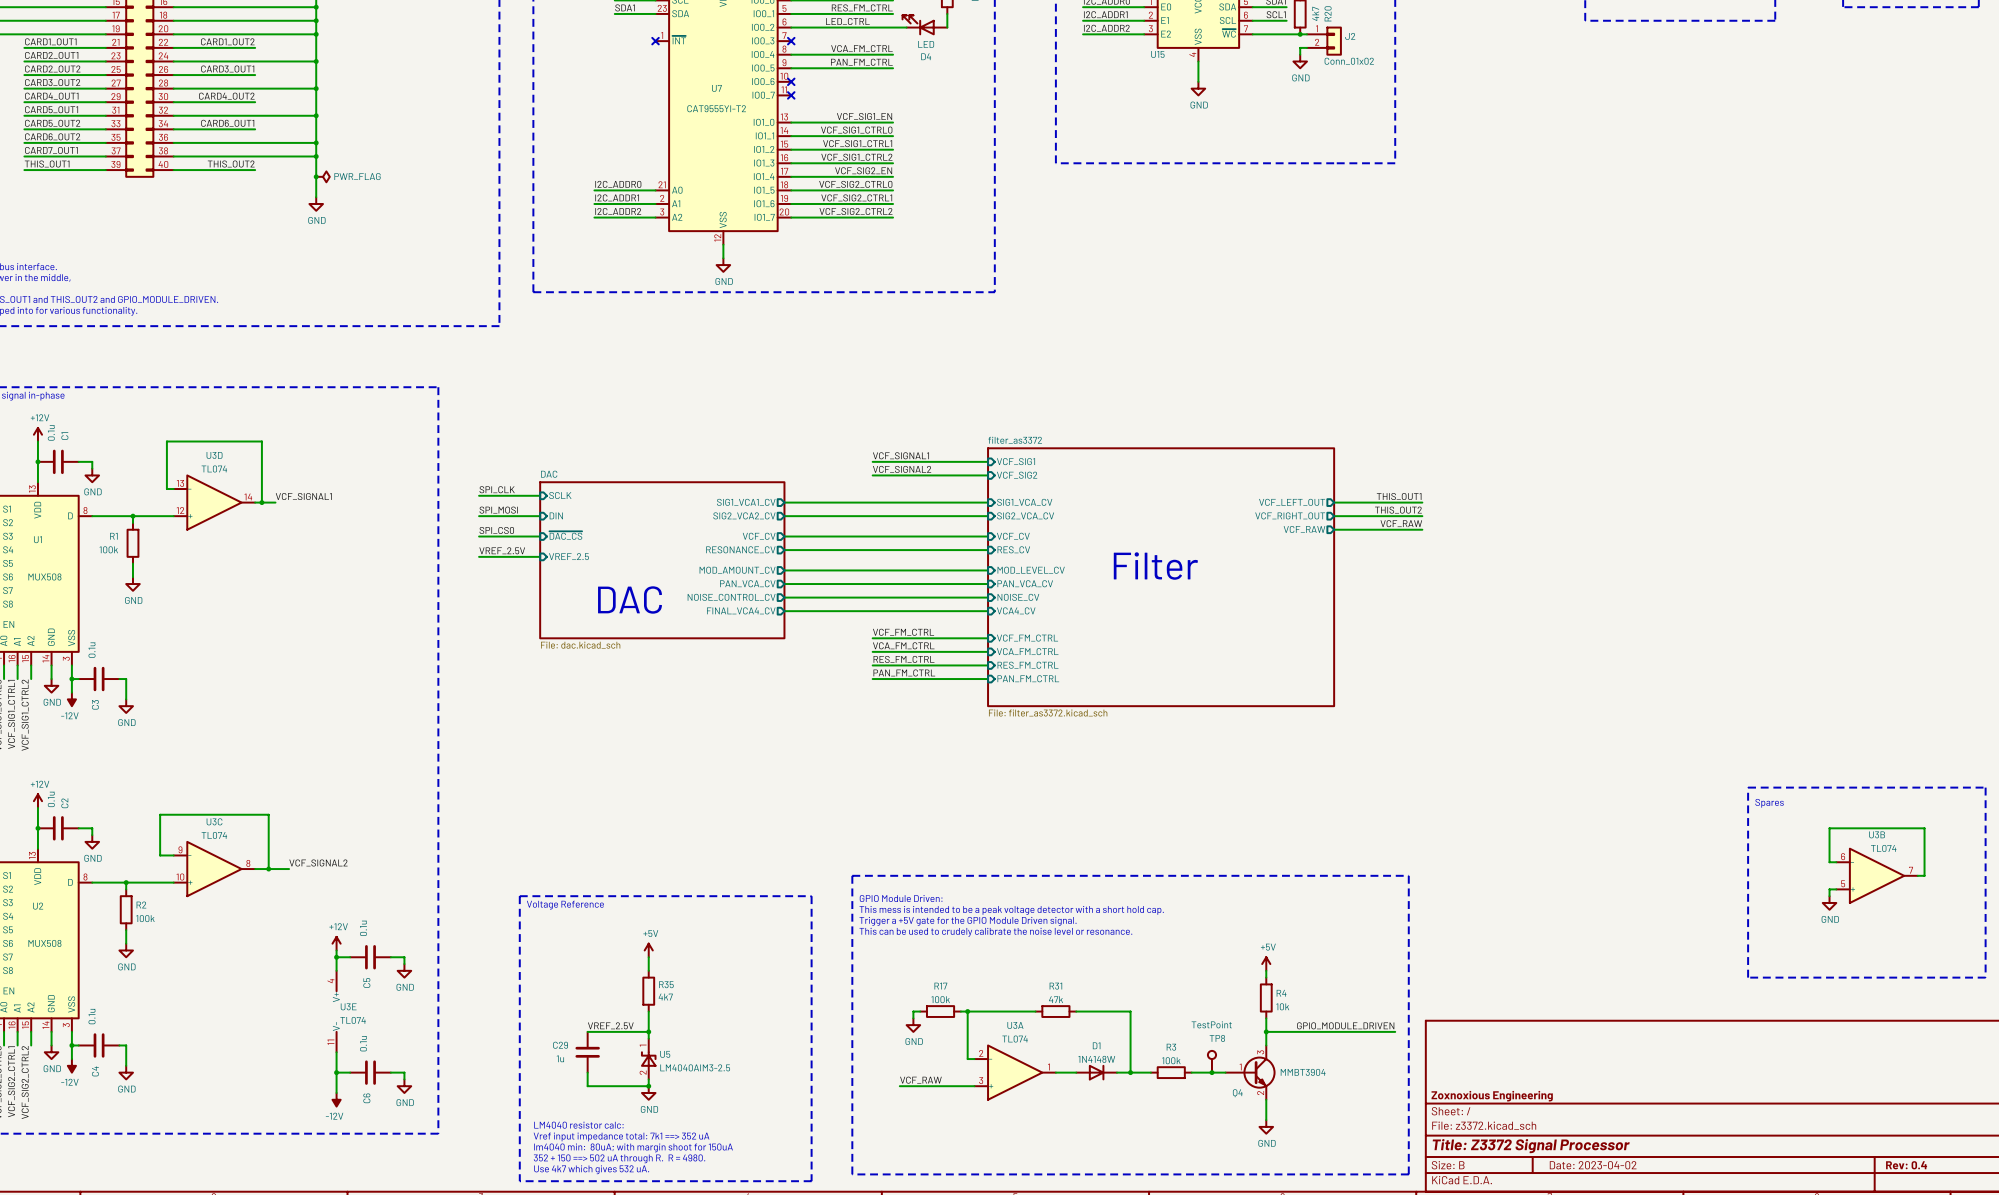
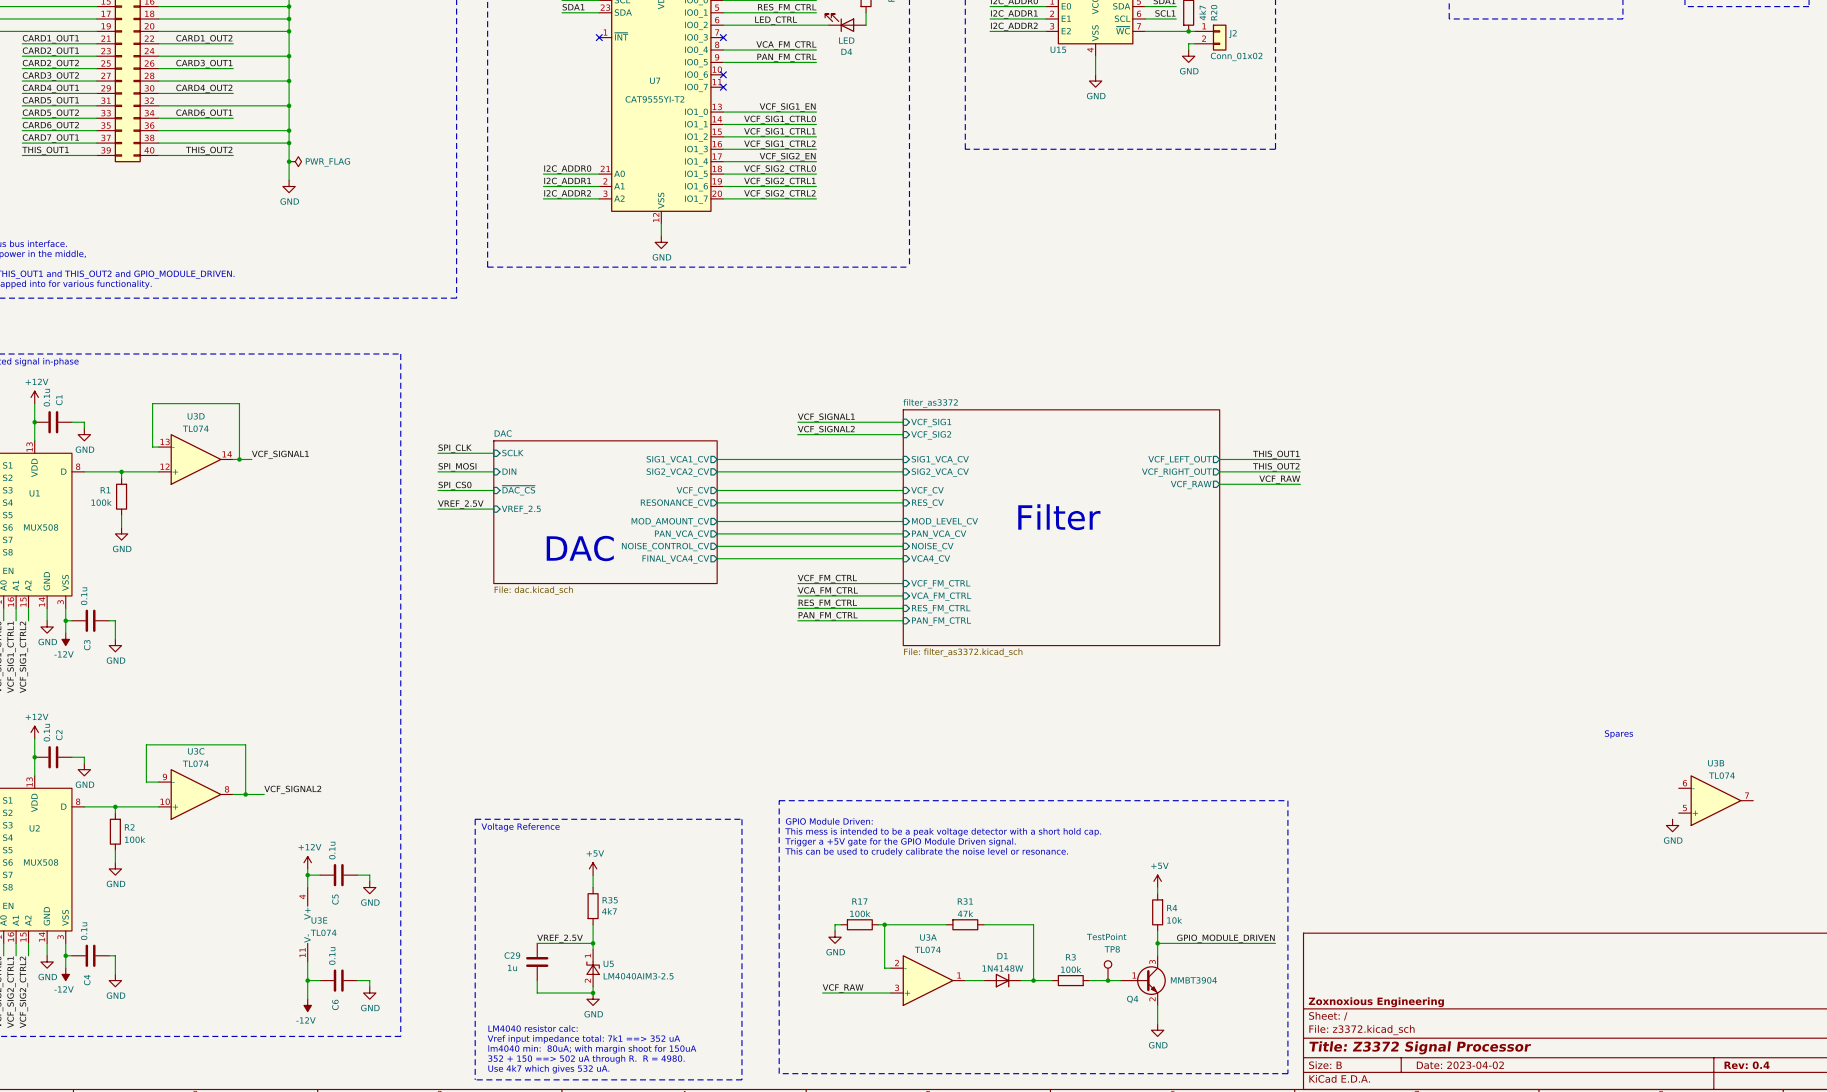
line: (1748, 787) (1985, 787) (1985, 977) (1748, 977) (1748, 787) -> none
wire: (1836, 862) (1829, 862) (1829, 828) (1924, 828) (1924, 875) (1917, 875) -> none
wire: (1836, 889) (1829, 889) (1829, 896) -> none

